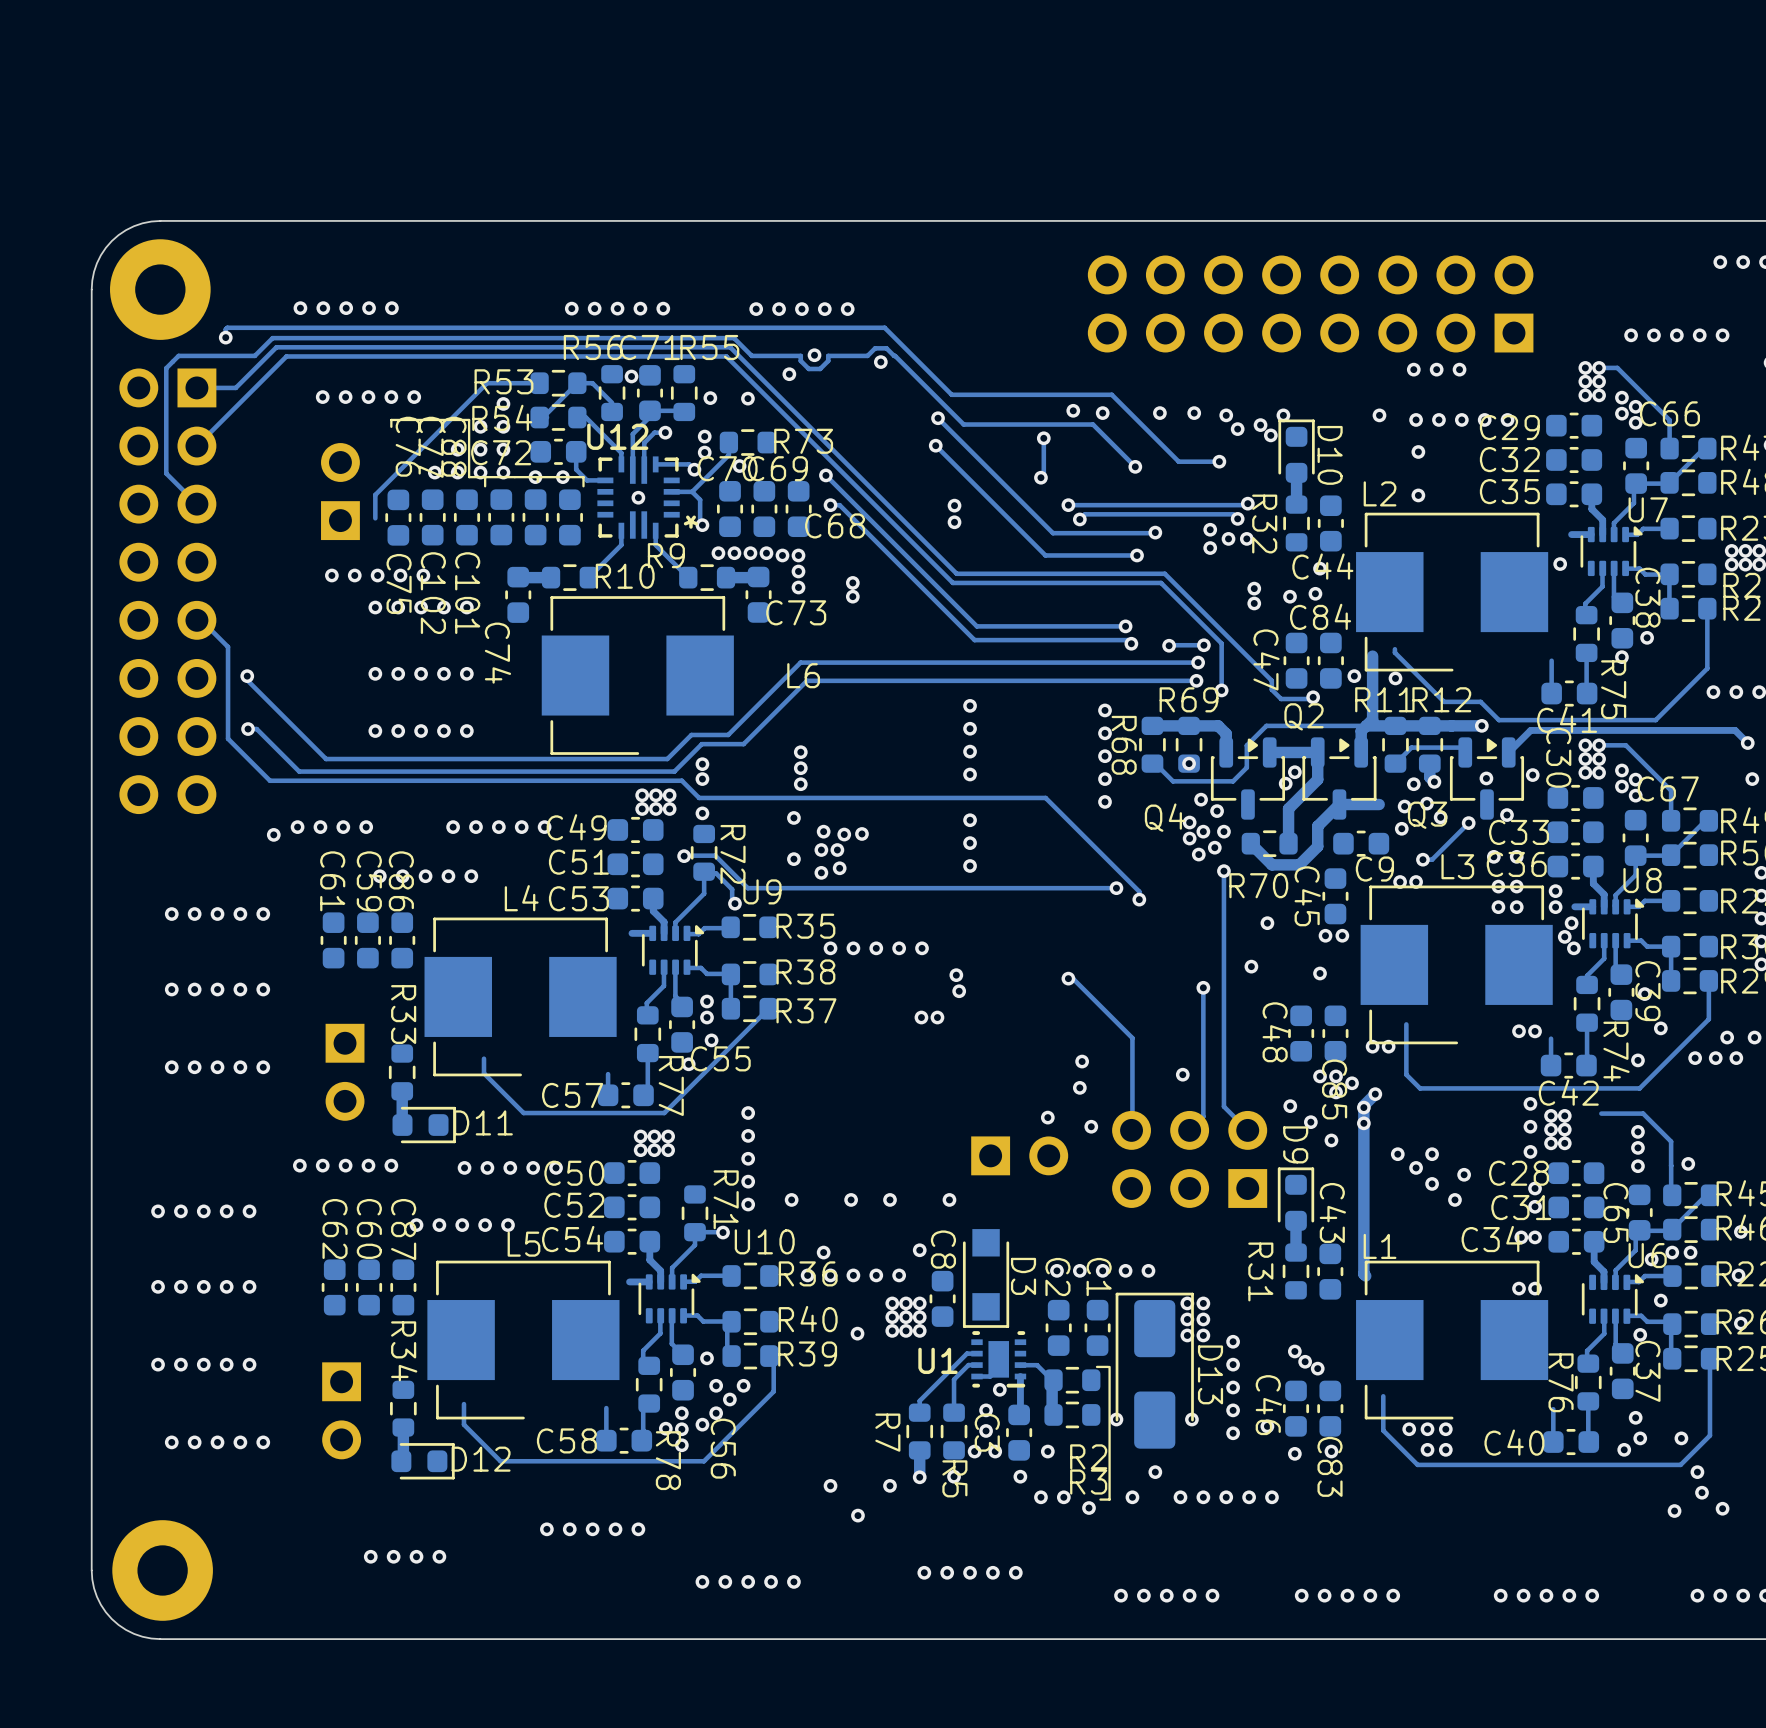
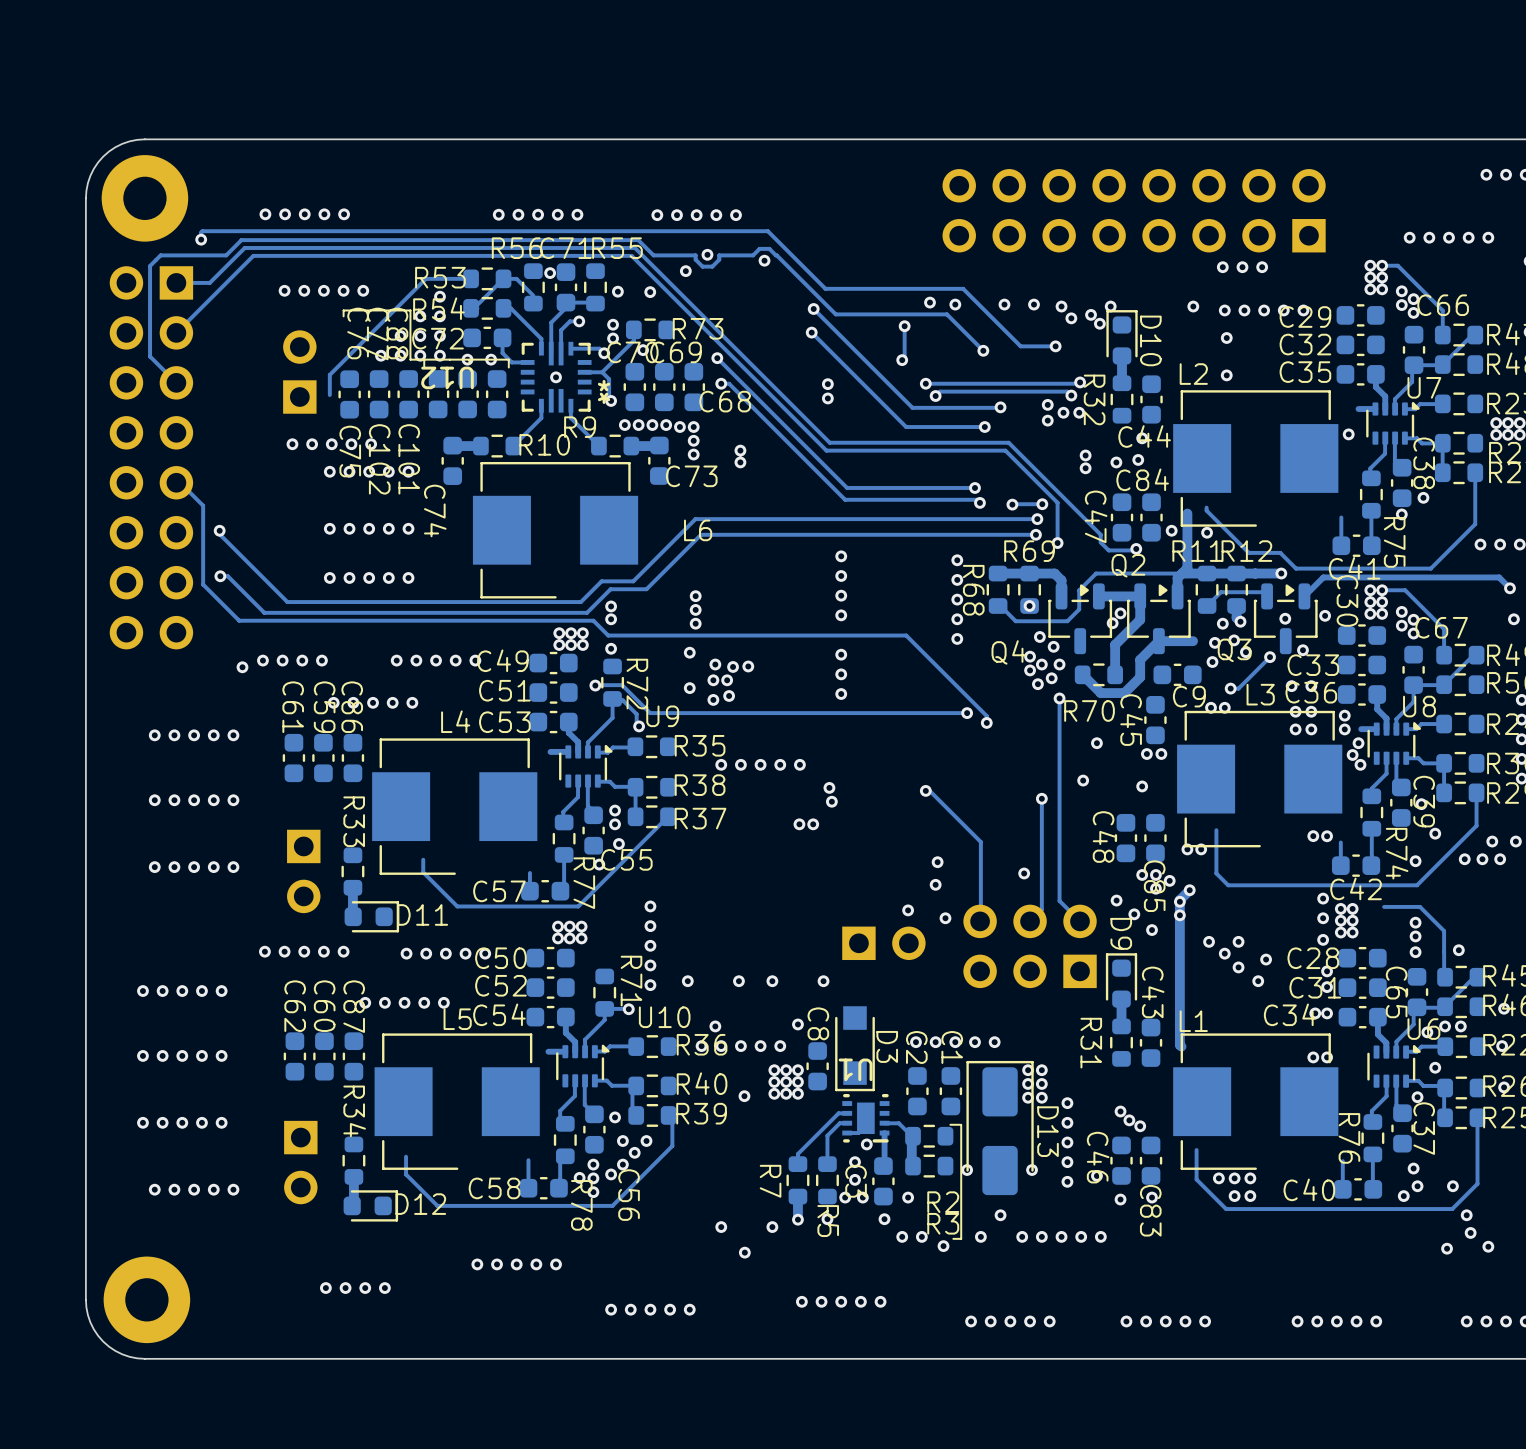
U12 name position: U12 (617, 436) -> U12 (447, 377)
U12 footprint: [597, 456, 680, 539] -> [520, 341, 592, 413]
U1 name rotation: 0° (938, 1360) -> 180° (855, 1069)
U1 name position: U1 (938, 1360) -> U1 (855, 1069)

